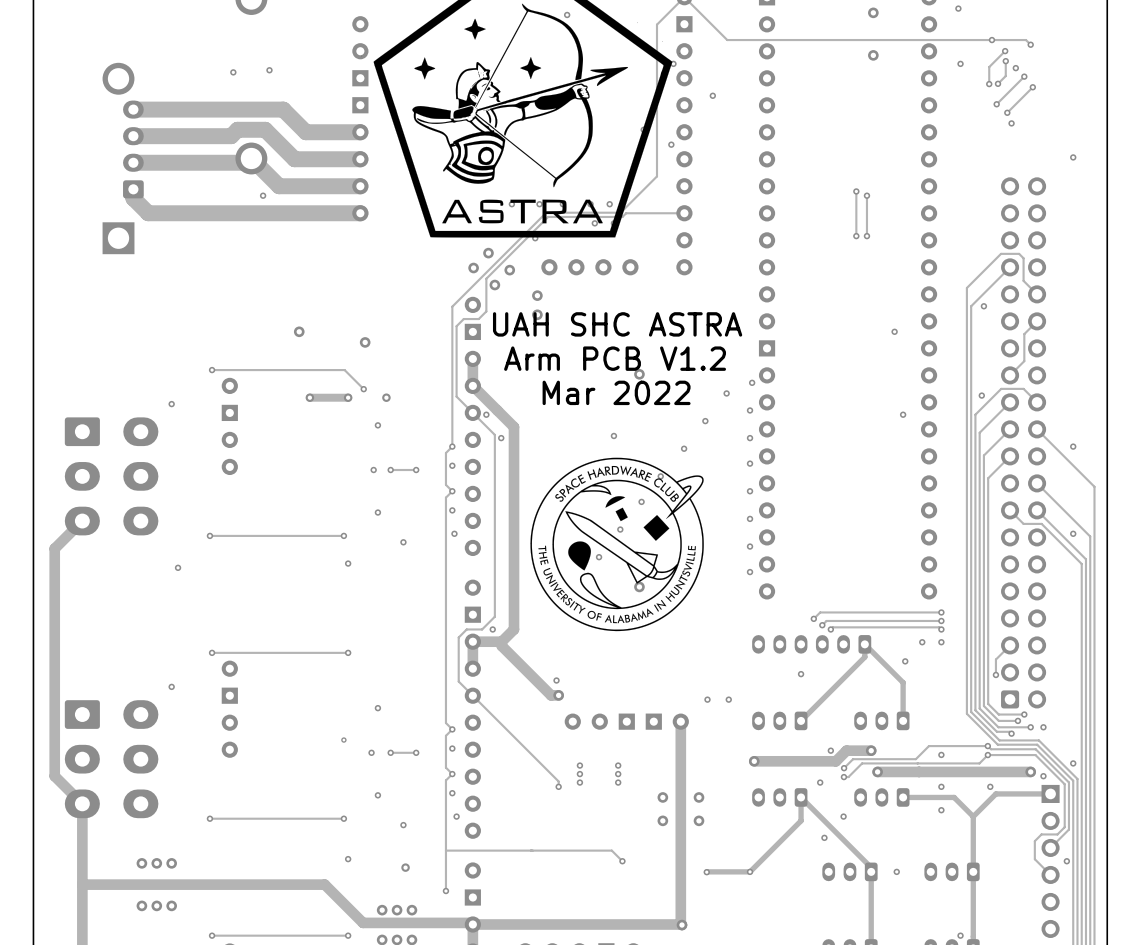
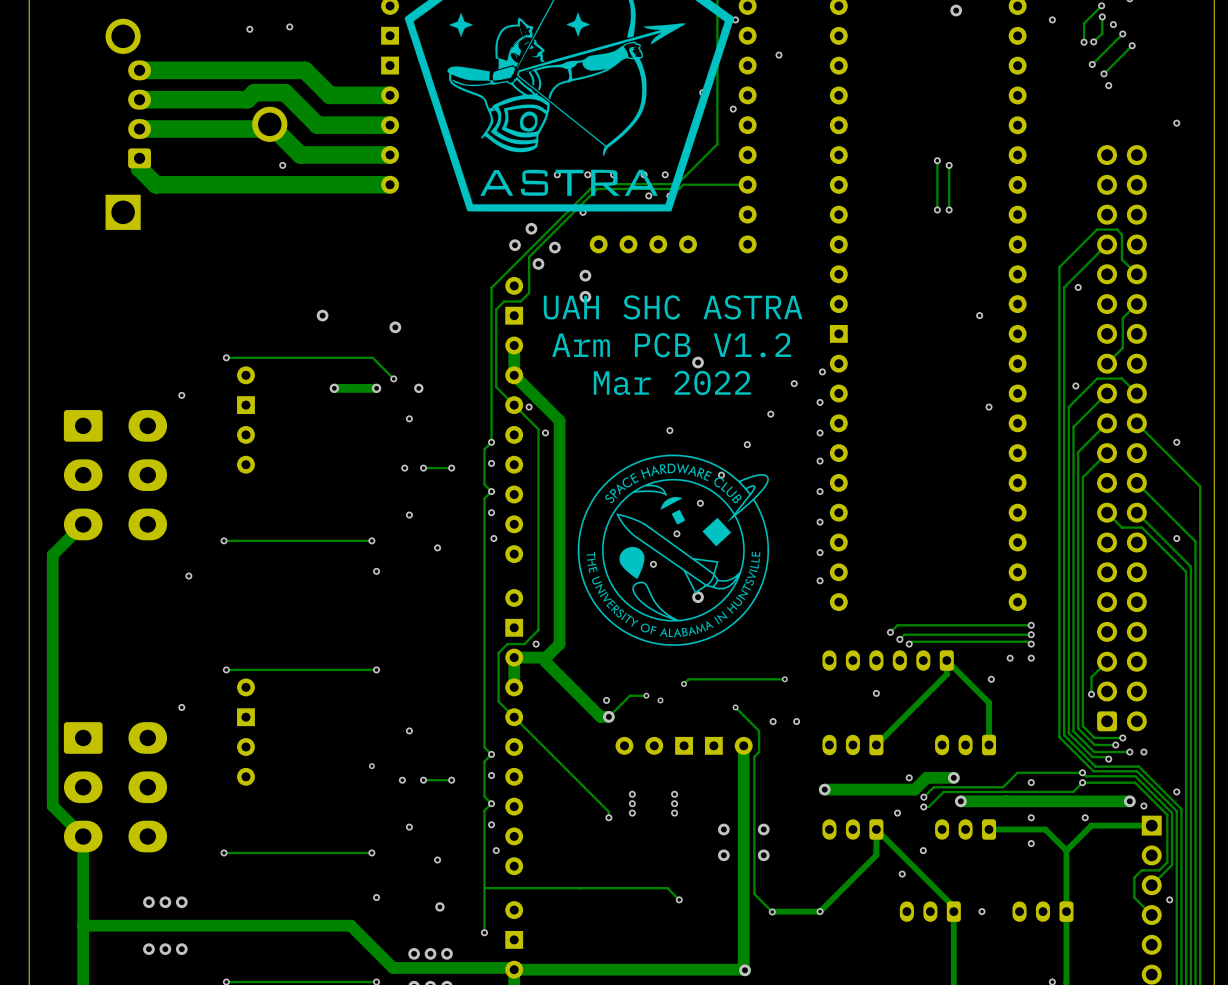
track: none -> (784, 679) (688, 679) (683, 684)
via: none -> (784, 679)
via: none -> (683, 684)
track: none -> (646, 695) (629, 695) (608, 716)
via: none -> (646, 695)
via: none -> (660, 700)
track: none -> (735, 707) (759, 730) (759, 752) (754, 756) (754, 894) (772, 911)
via: none -> (735, 707)

